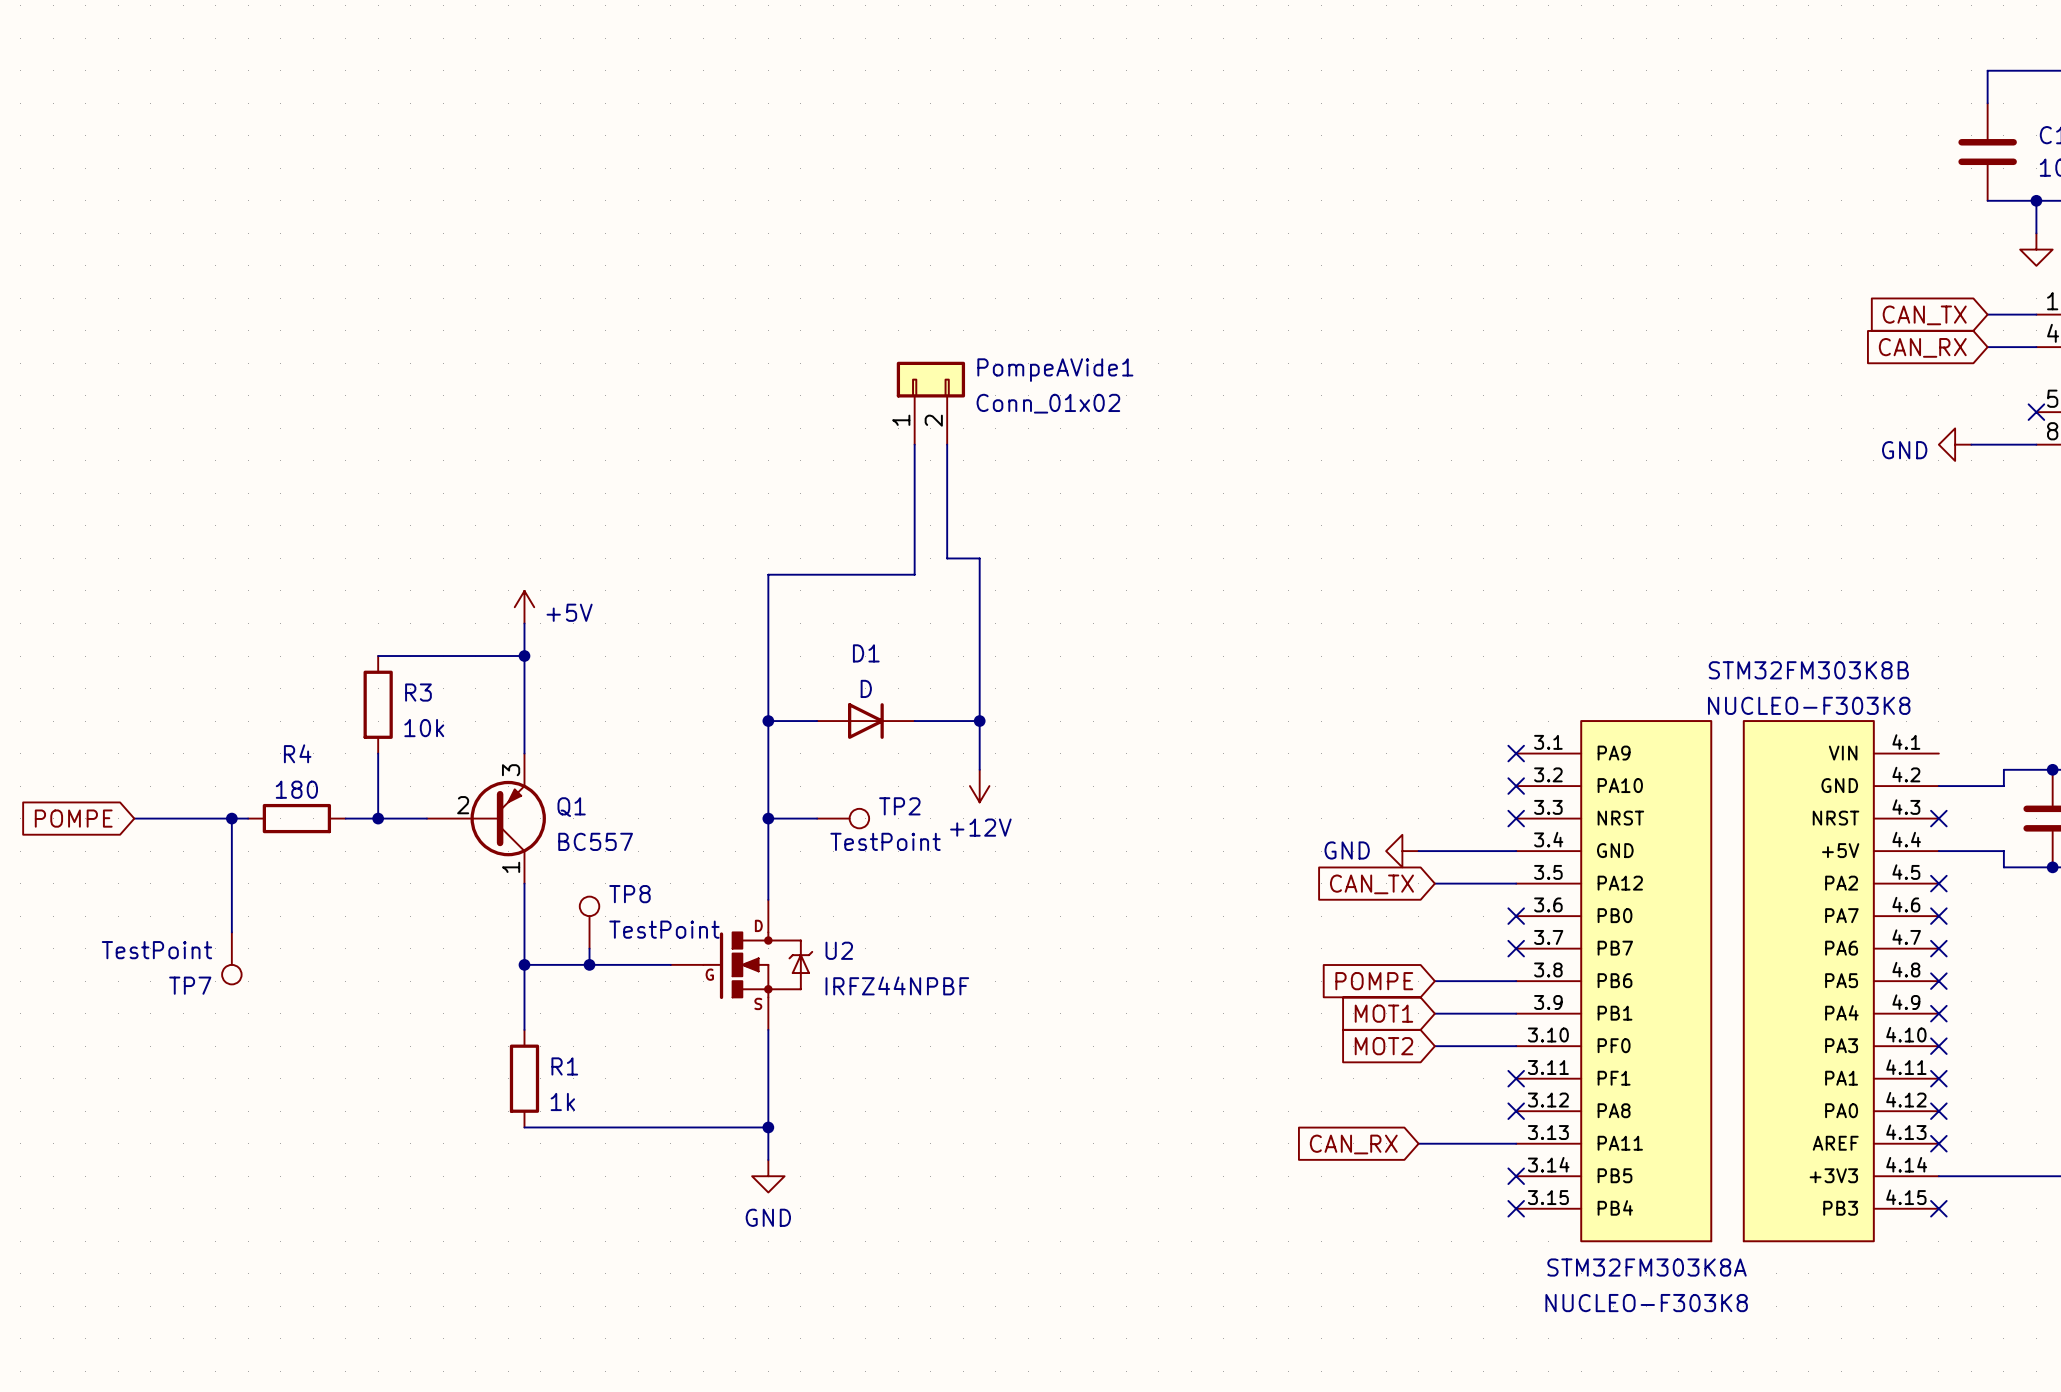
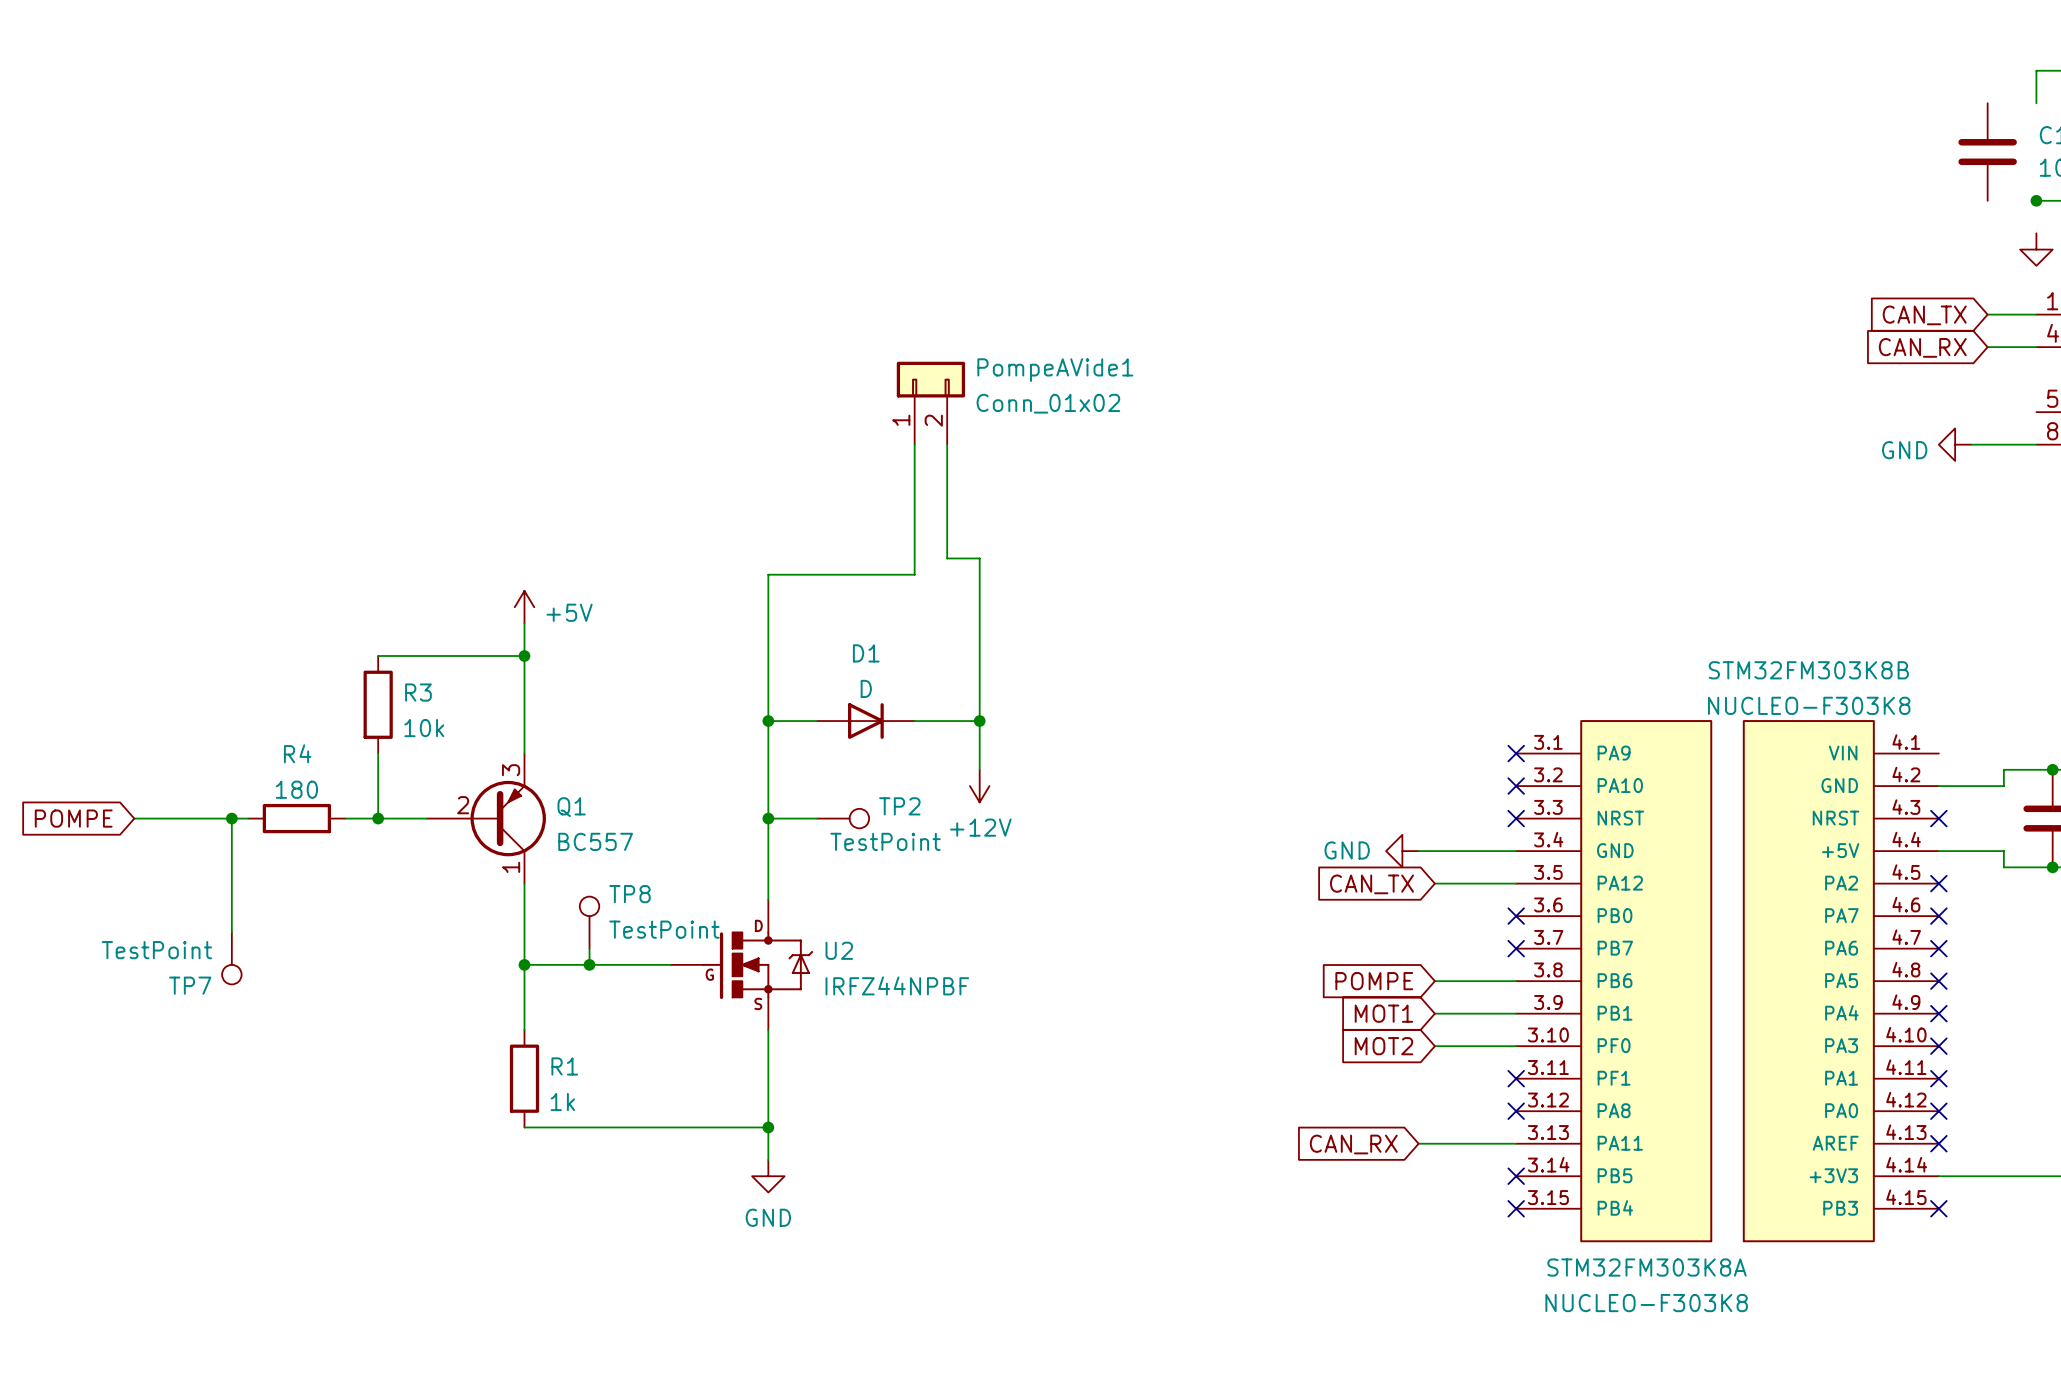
wire: (2036, 70) (1987, 70) (1987, 103) -> (2036, 70) (2036, 103)
wire: (1987, 200) (2036, 200) (2036, 233) -> none
no-connect mark: (2036, 412) -> none

